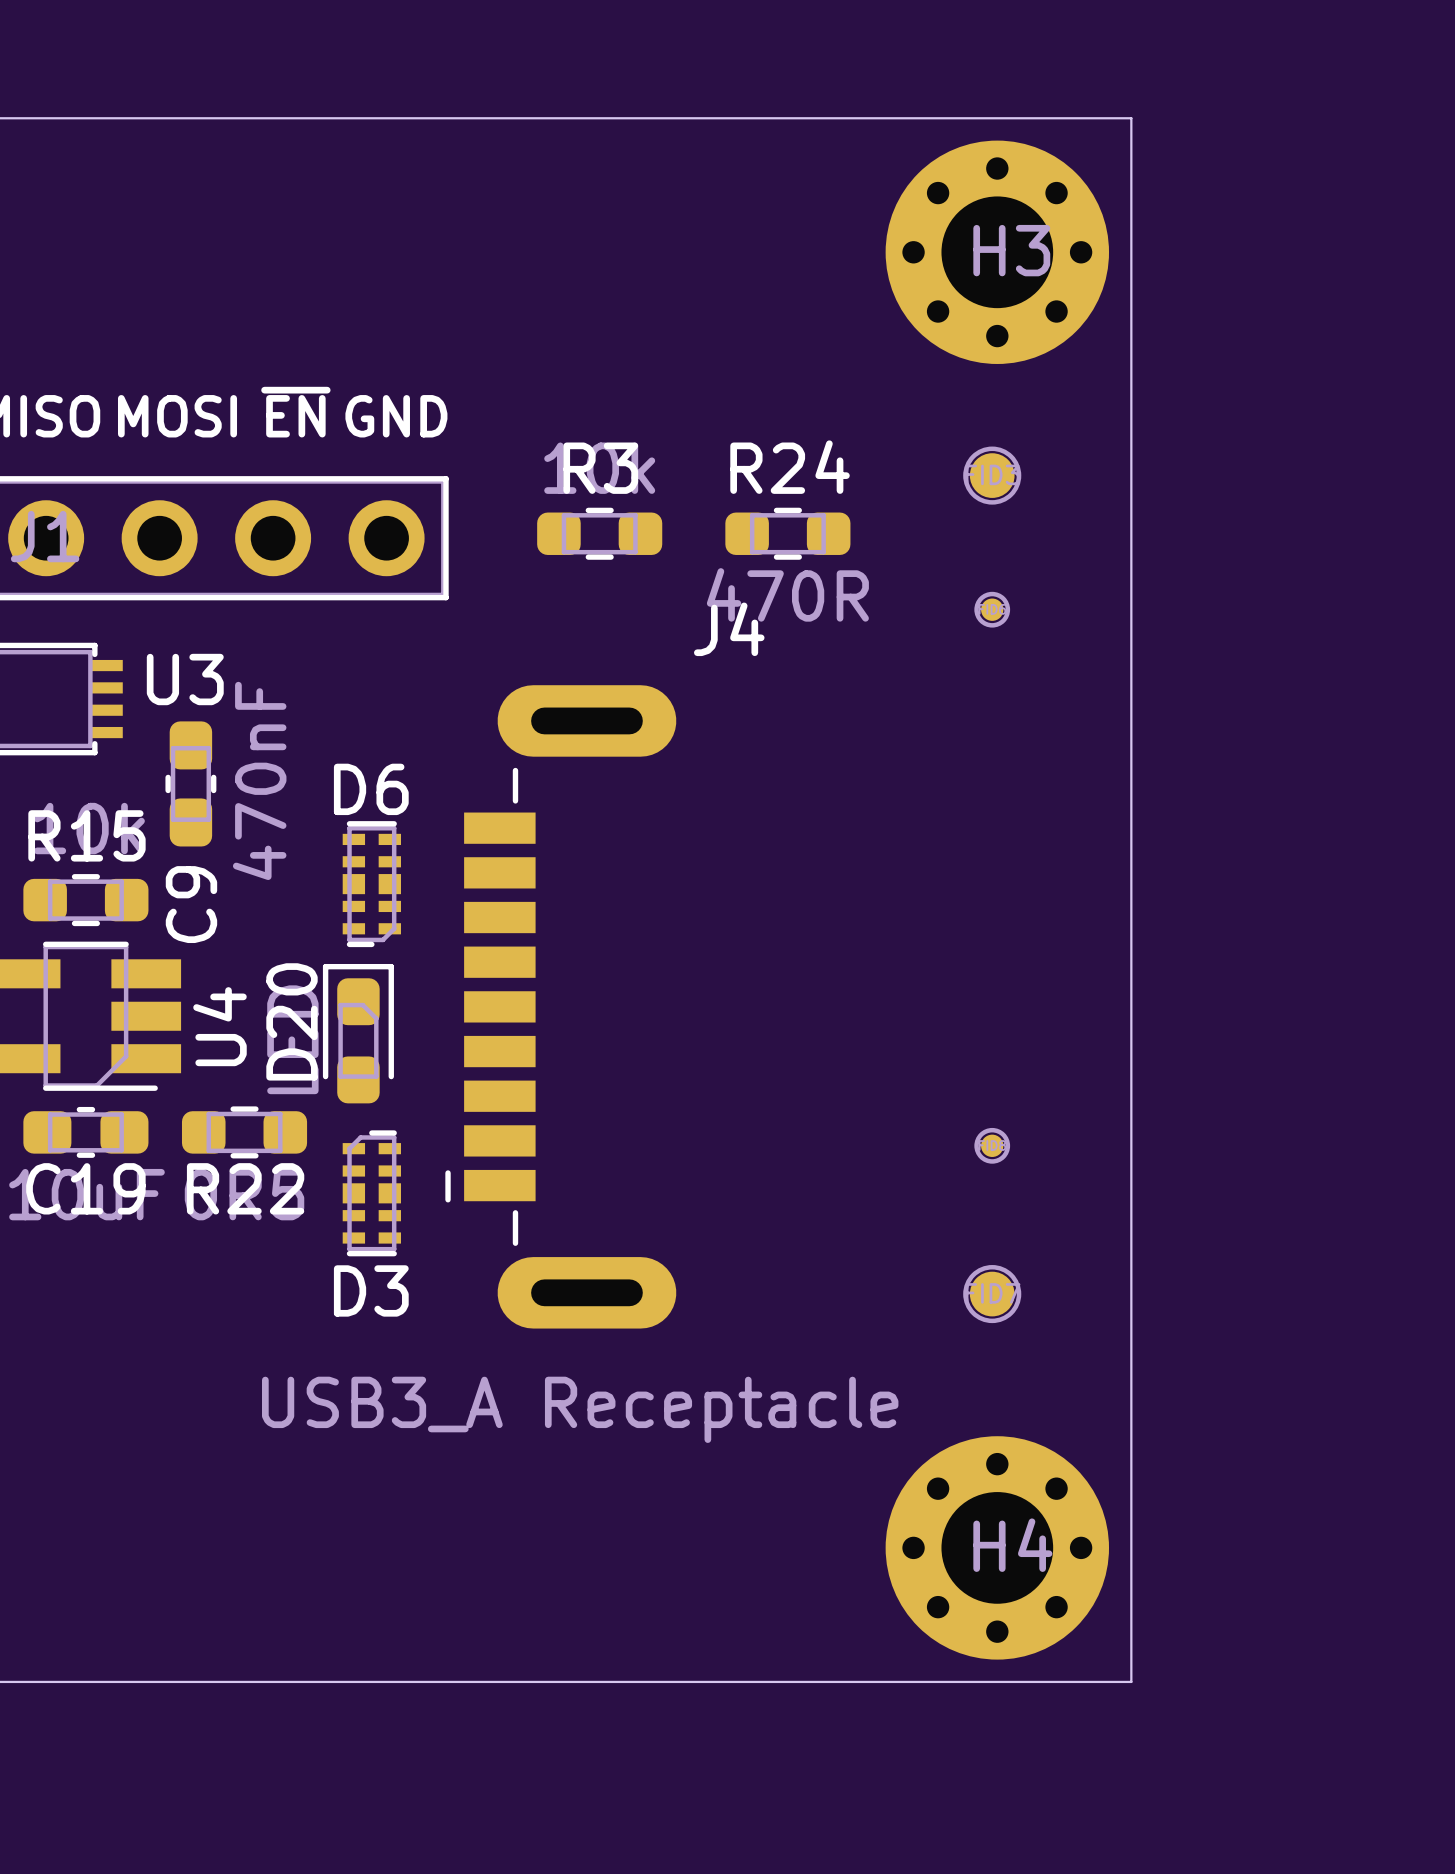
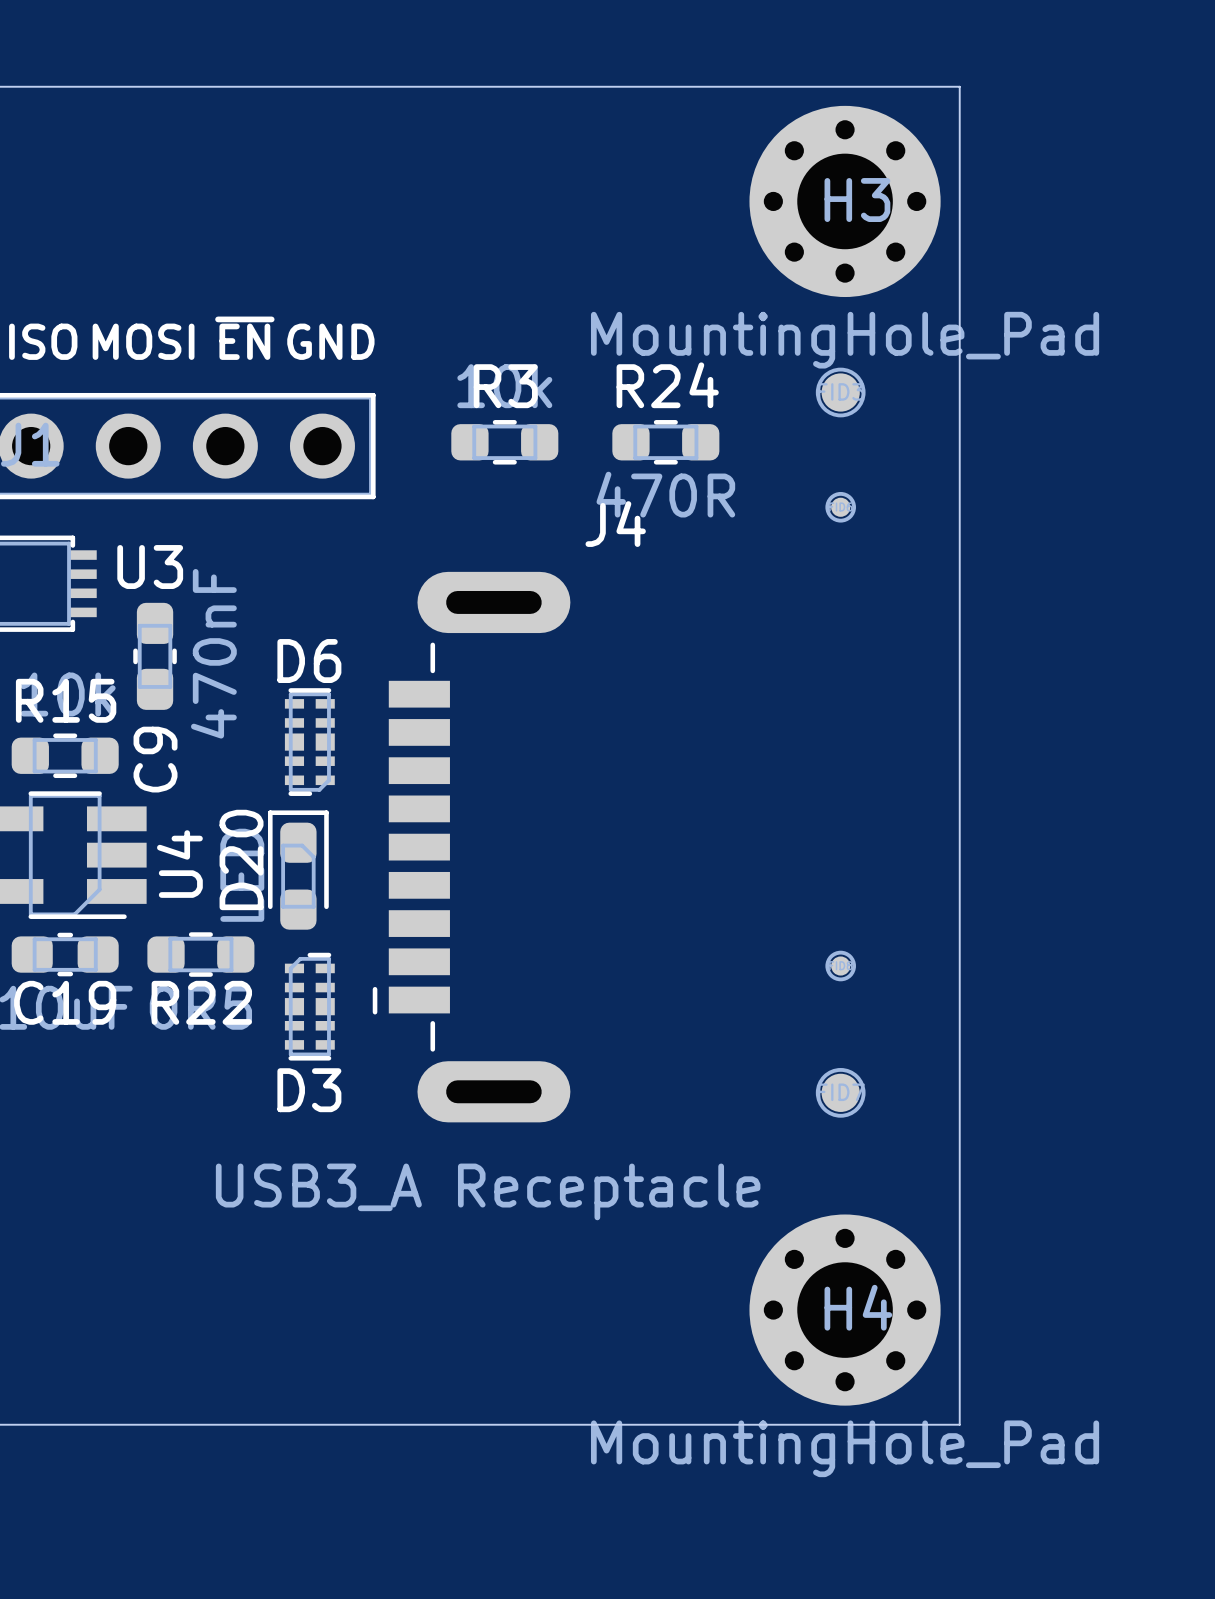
H3 value: none -> MountingHole_Pad (845, 340)
H4 value: none -> MountingHole_Pad (845, 1448)

